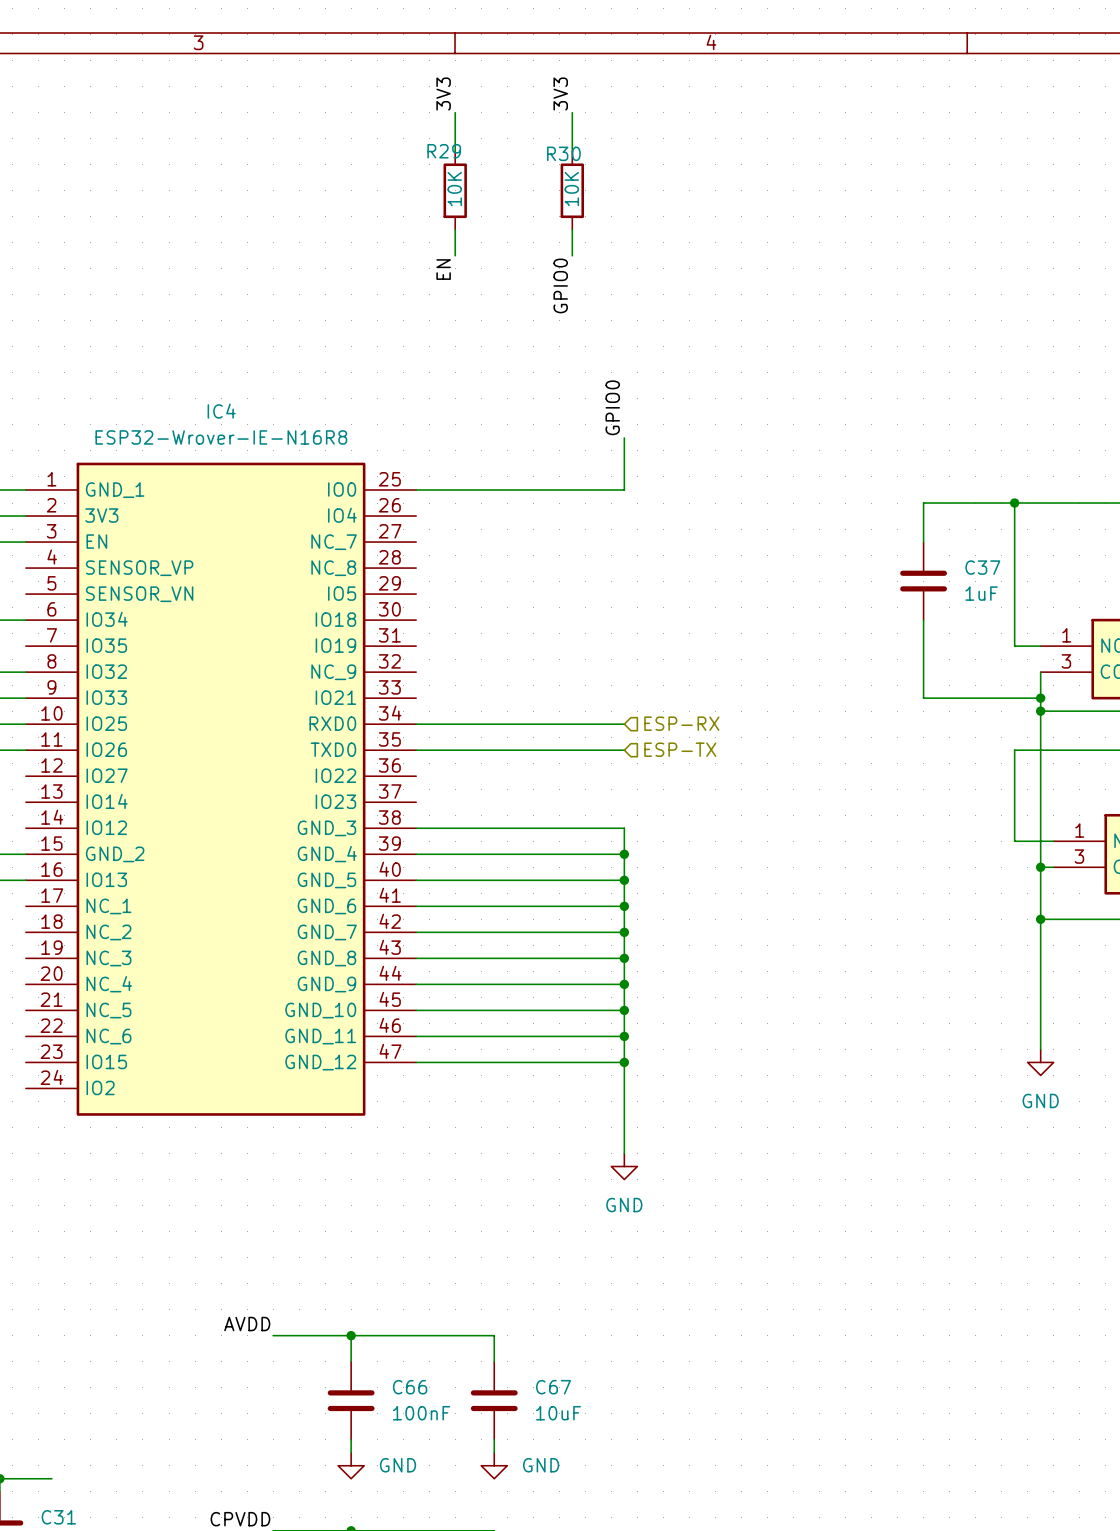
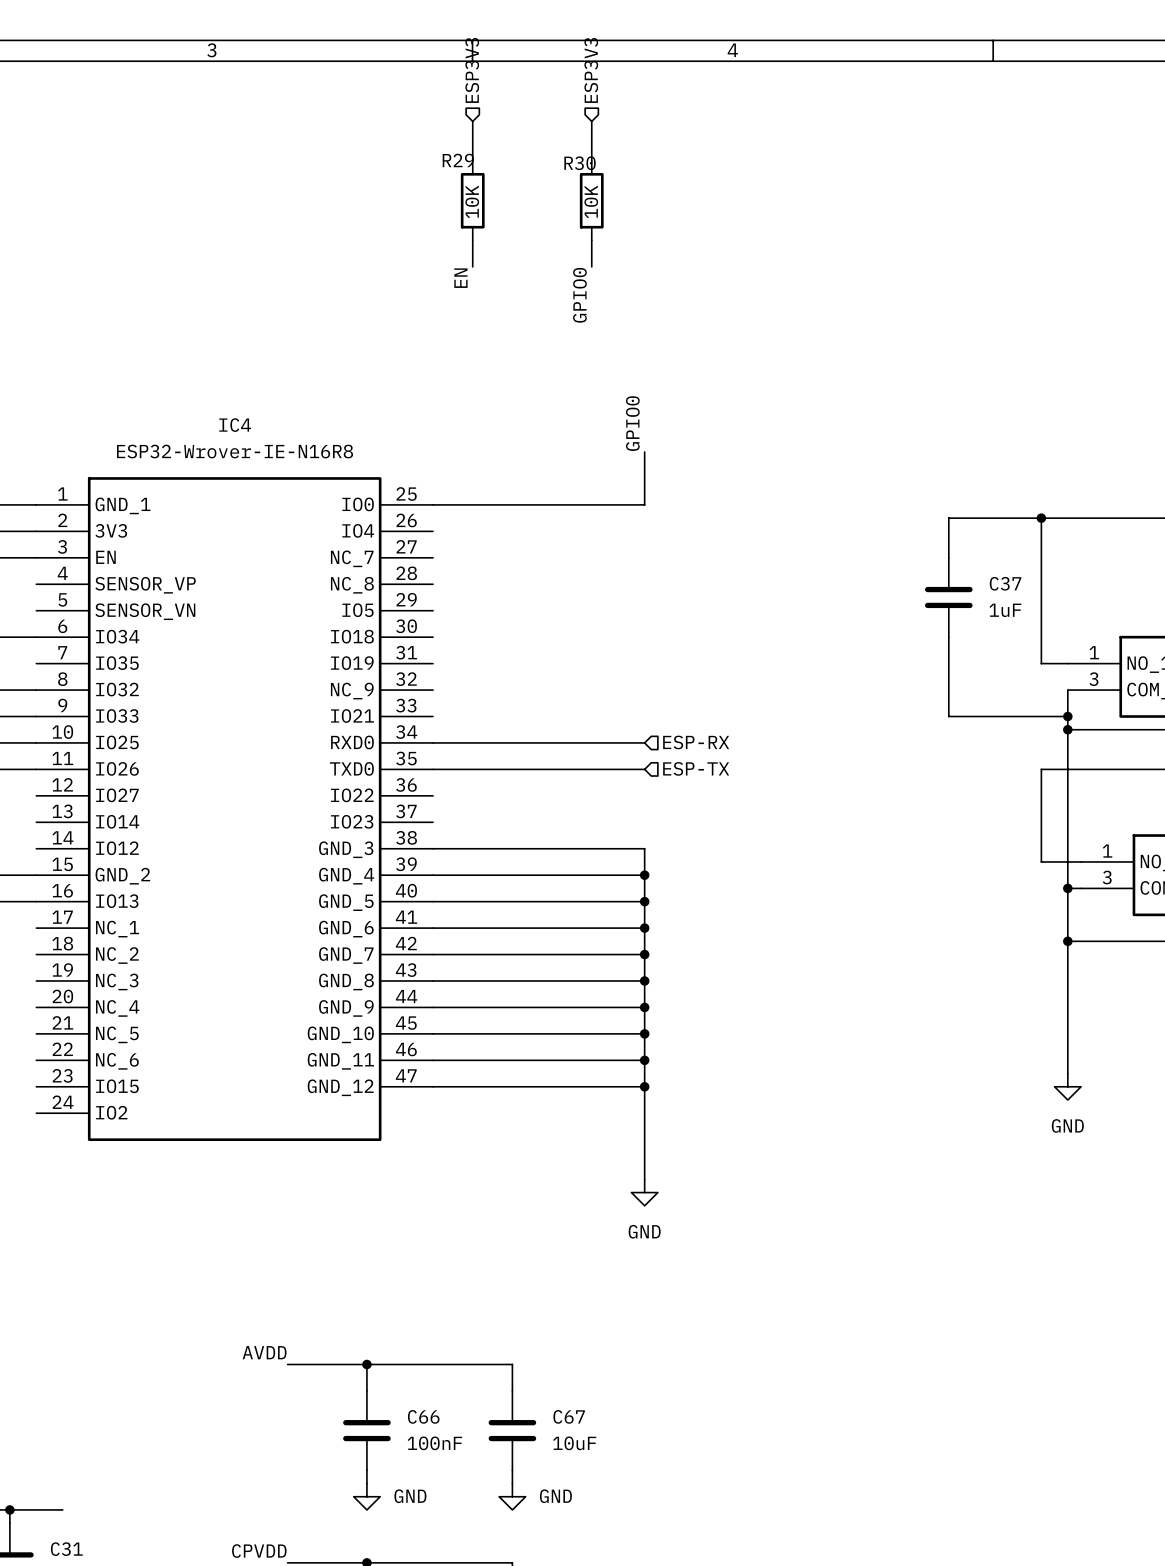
hierarchical label: none -> ESP3V3 (472, 70)
hierarchical label: none -> ESP3V3 (591, 70)
label: 3V3 (443, 94) -> none
label: 3V3 (560, 94) -> none

